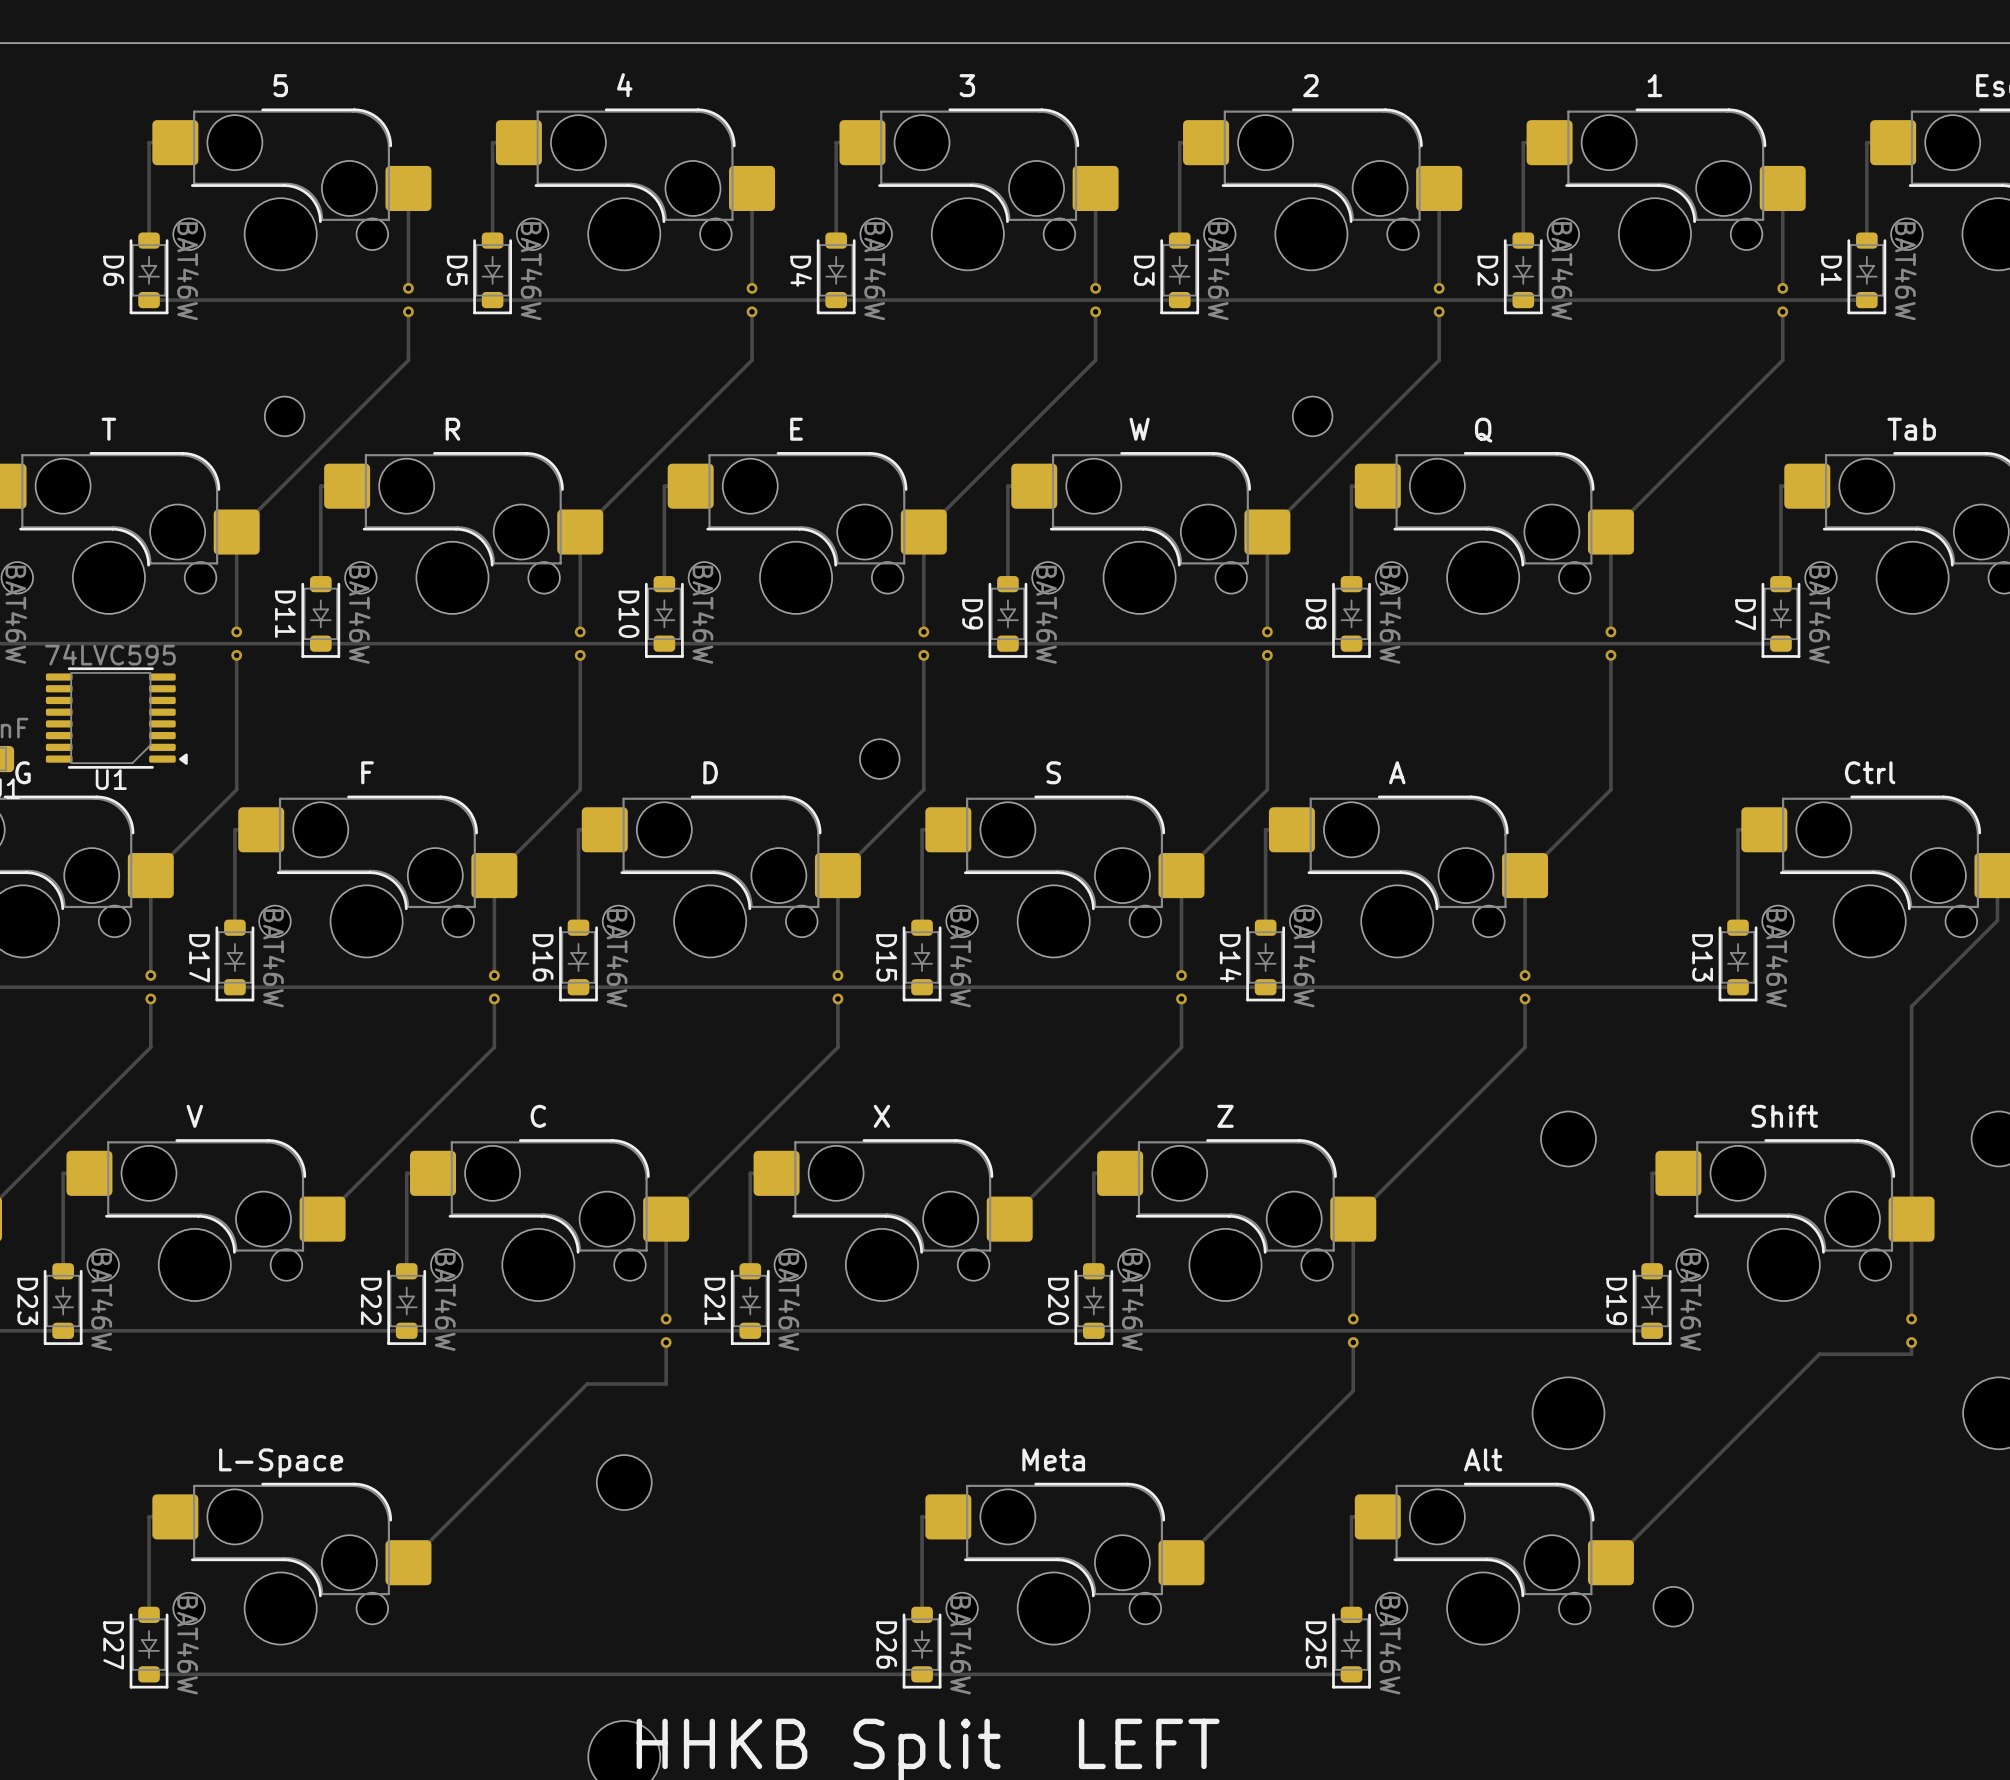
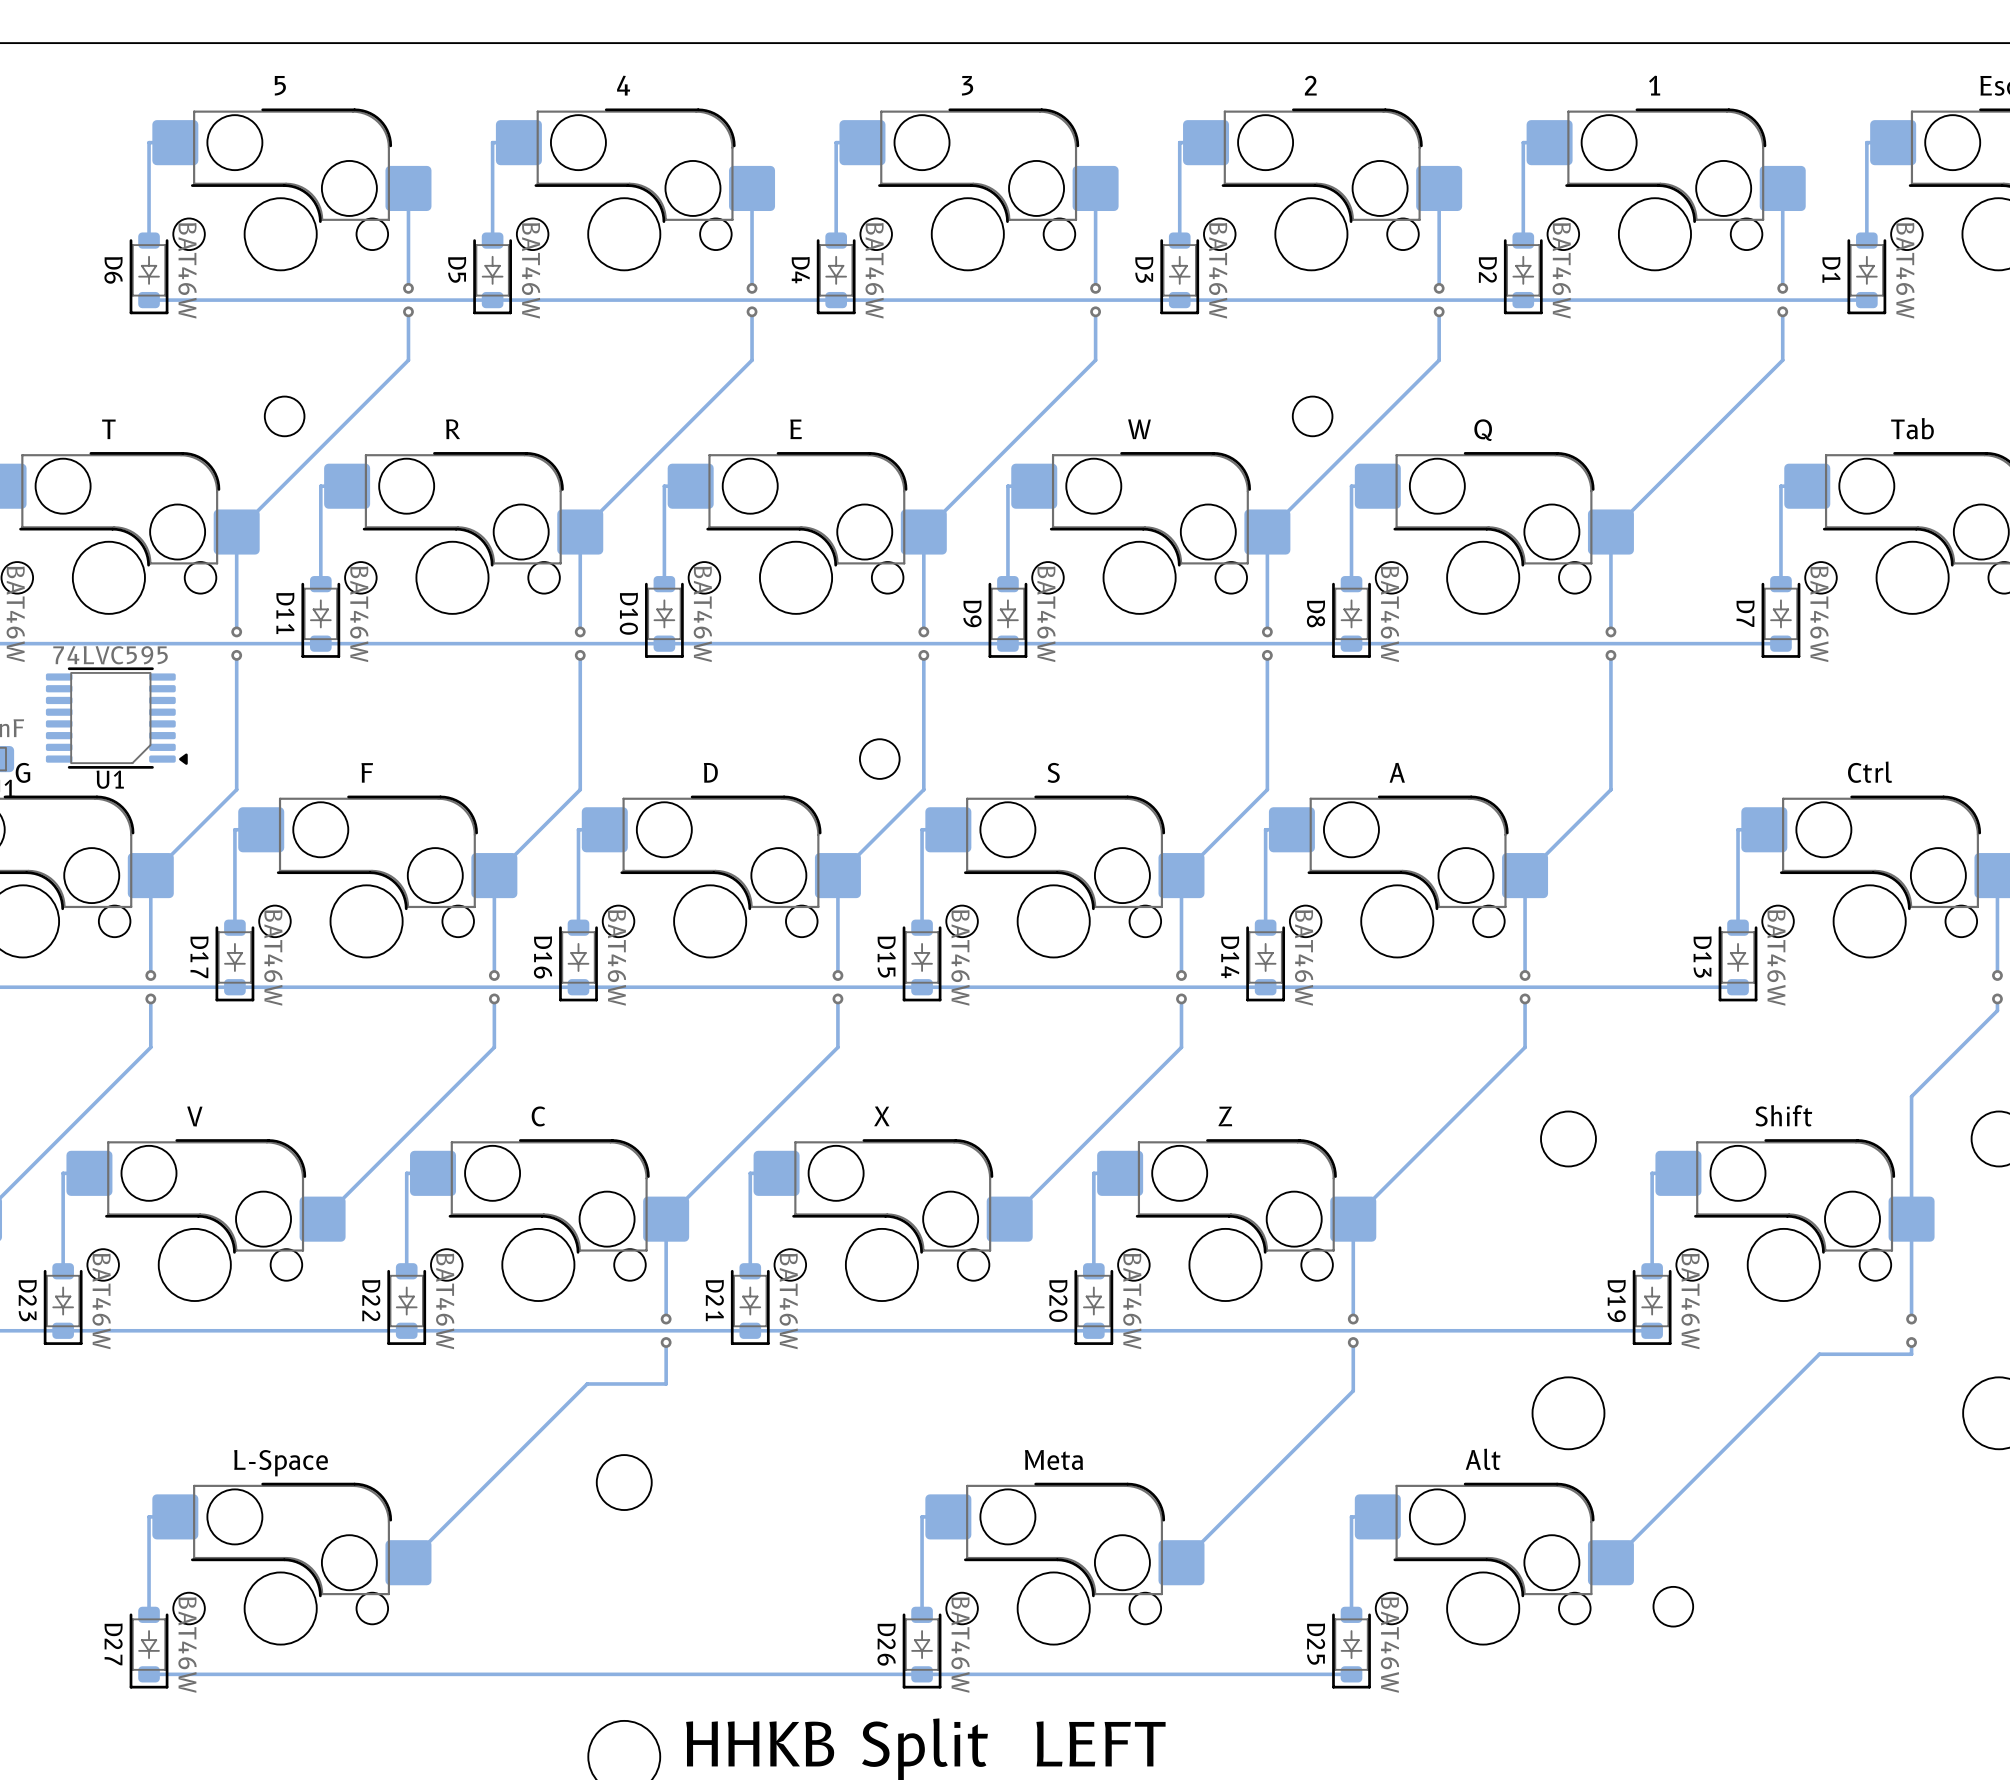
track: (1997, 920) (1911, 1006) (1911, 1096) -> (1997, 998) (1997, 1010) (1911, 1096)
track: none -> (1997, 920) (1997, 975)
via: none -> (1997, 975)
via: none -> (1997, 998)

